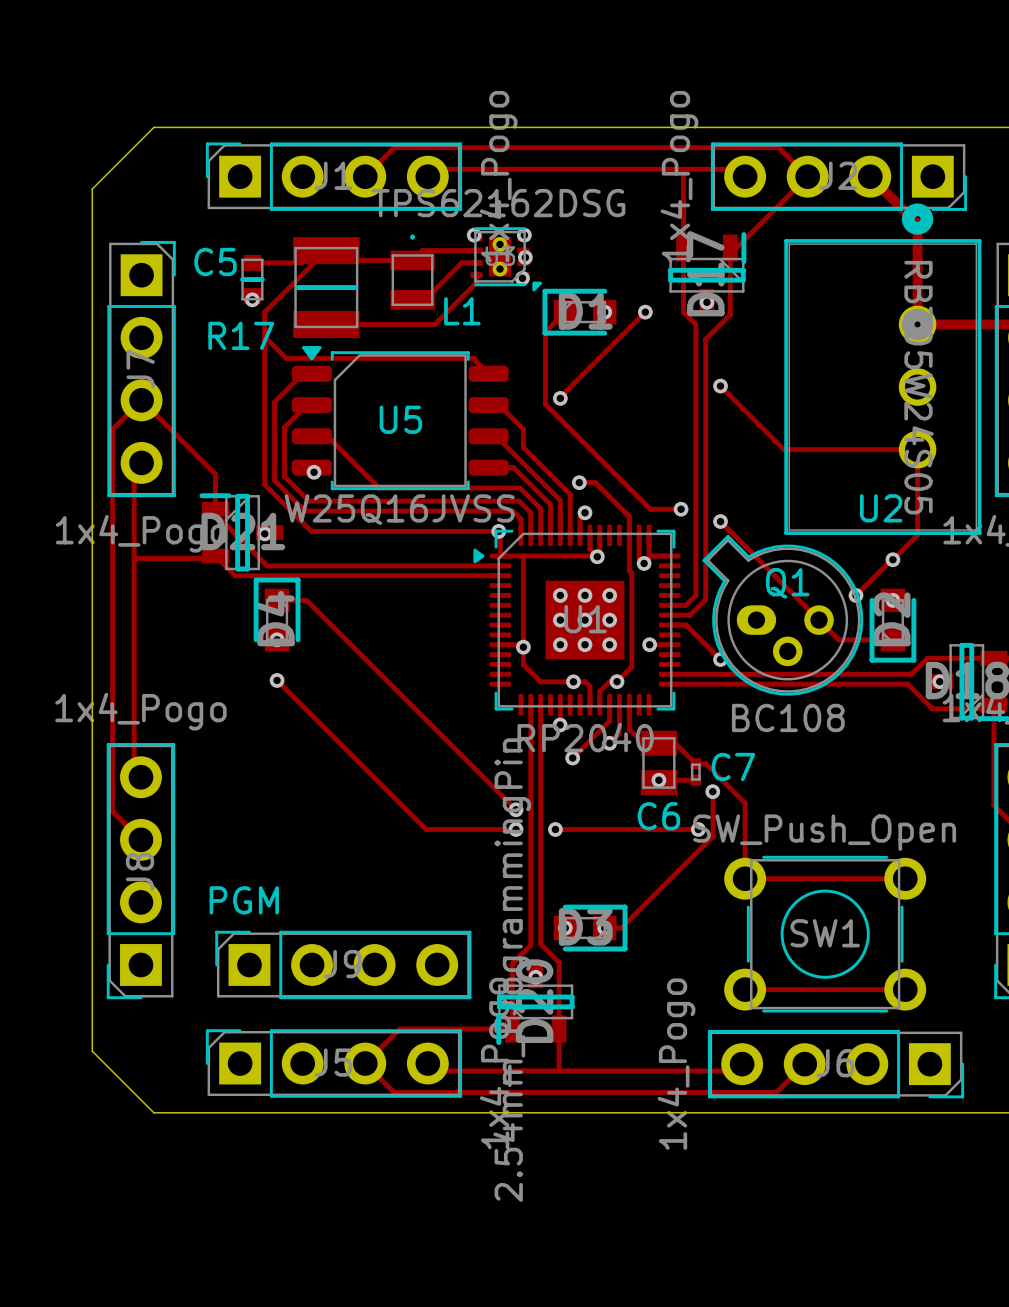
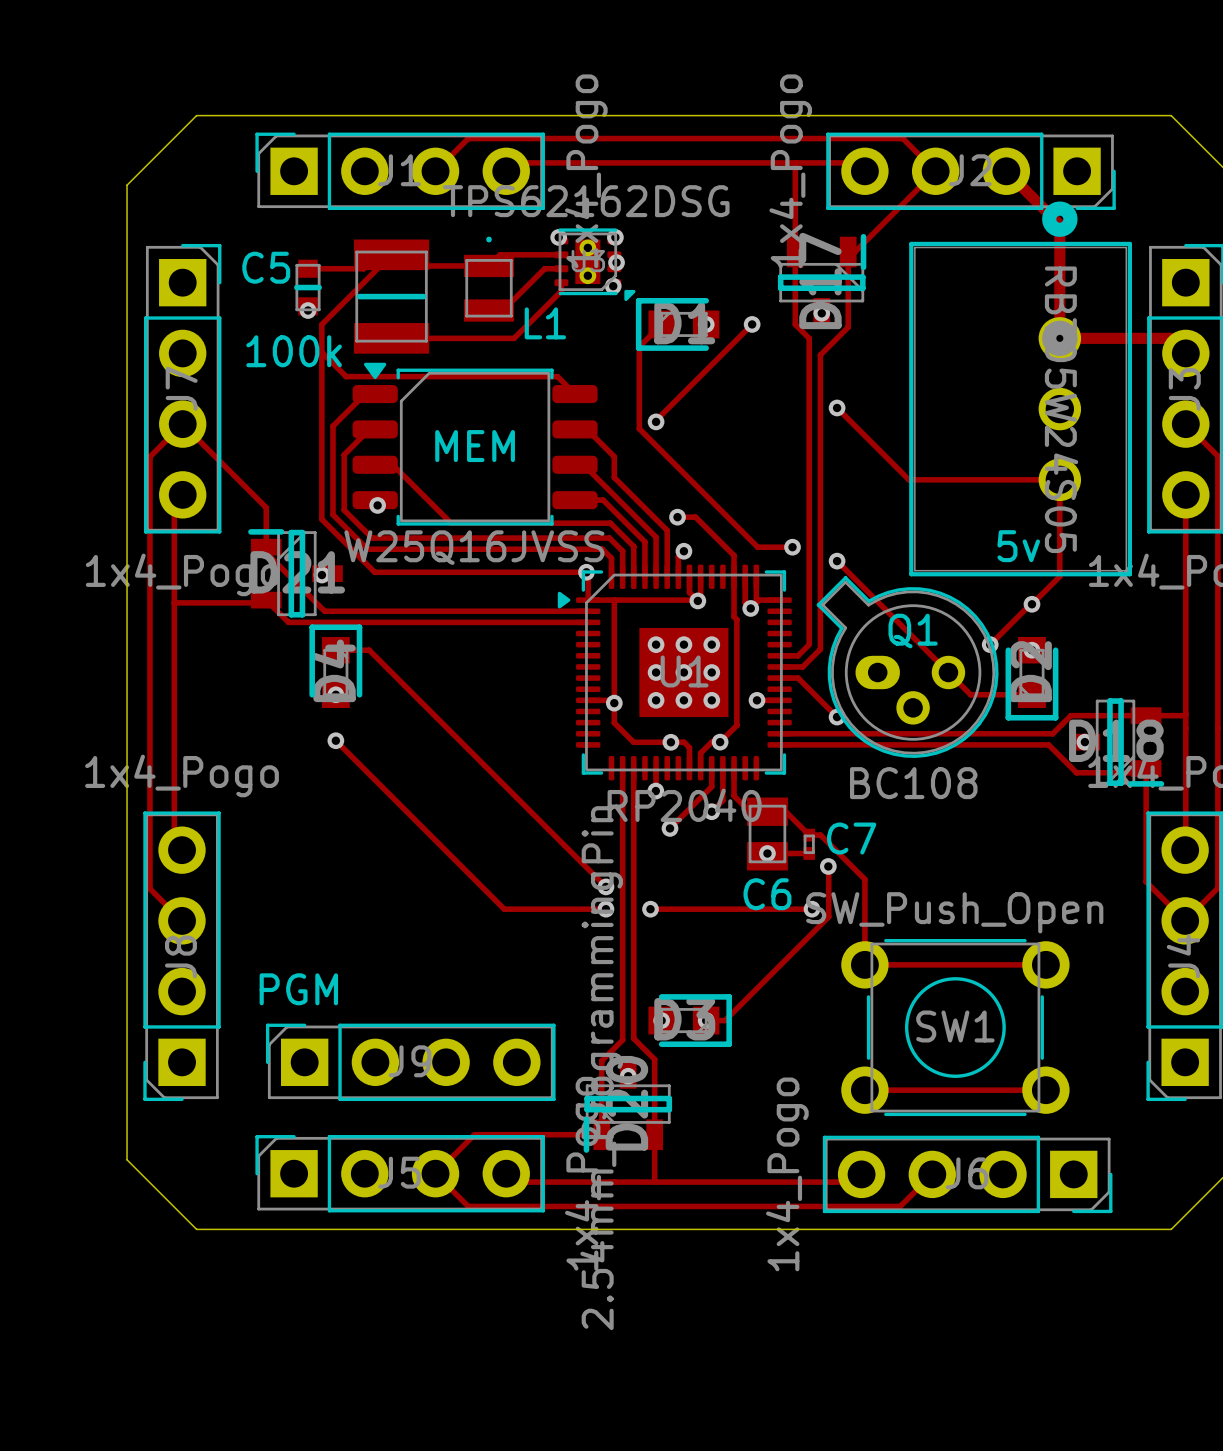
R17 name: R17 (241, 335) -> 100k (294, 351)
U5 name: U5 (400, 419) -> MEM (475, 446)
U2 name: U2 (881, 508) -> 5v (1018, 546)

